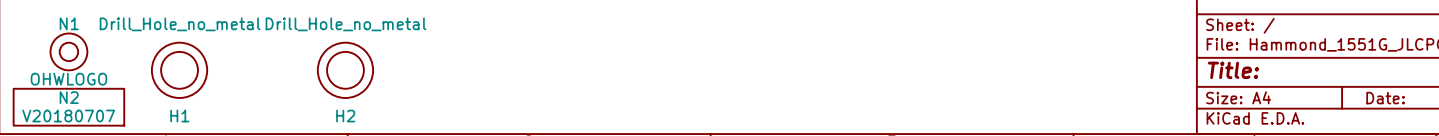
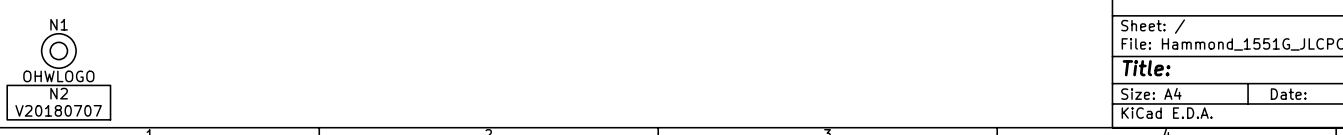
H1: Drill_Hole_no_metal (179, 70) -> none
H2: Drill_Hole_no_metal (345, 70) -> none

